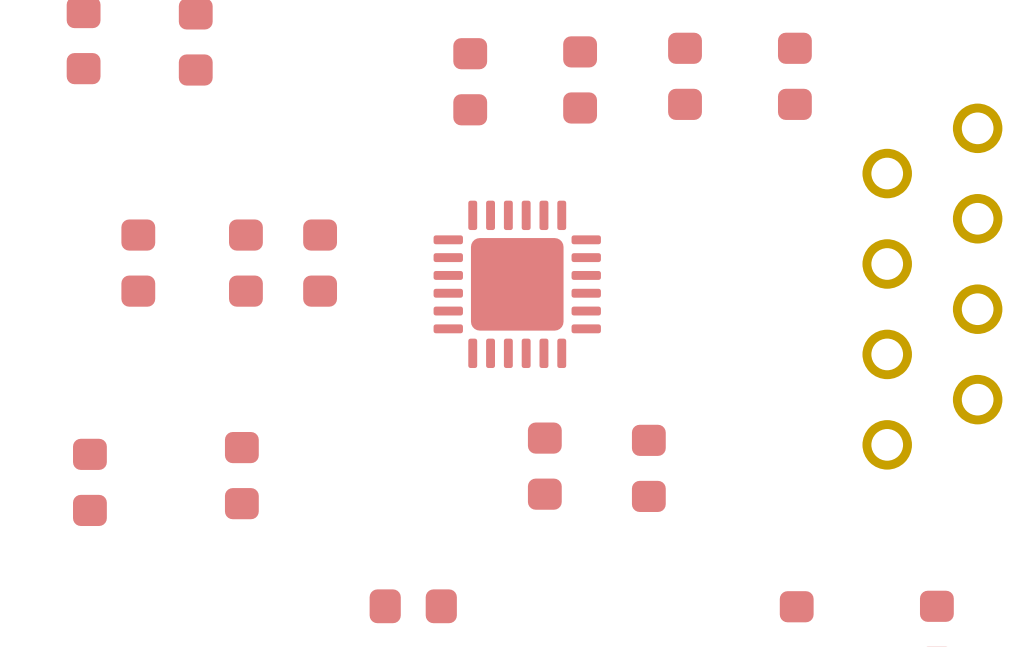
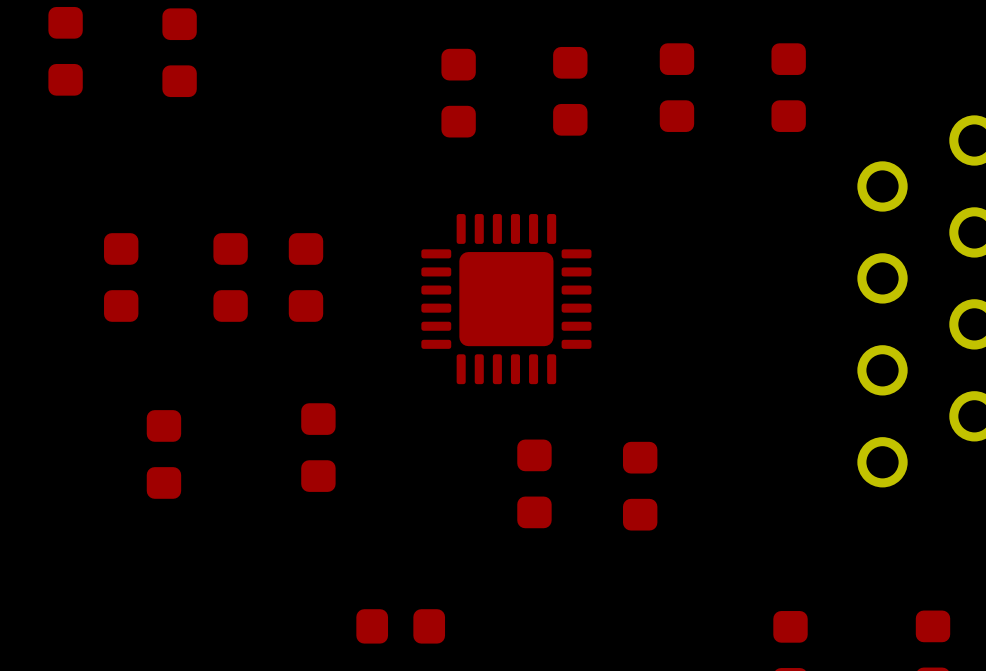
part: none -> (318, 447)
part: none -> (163, 454)
part: (241, 475) -> none
part: (89, 482) -> none

